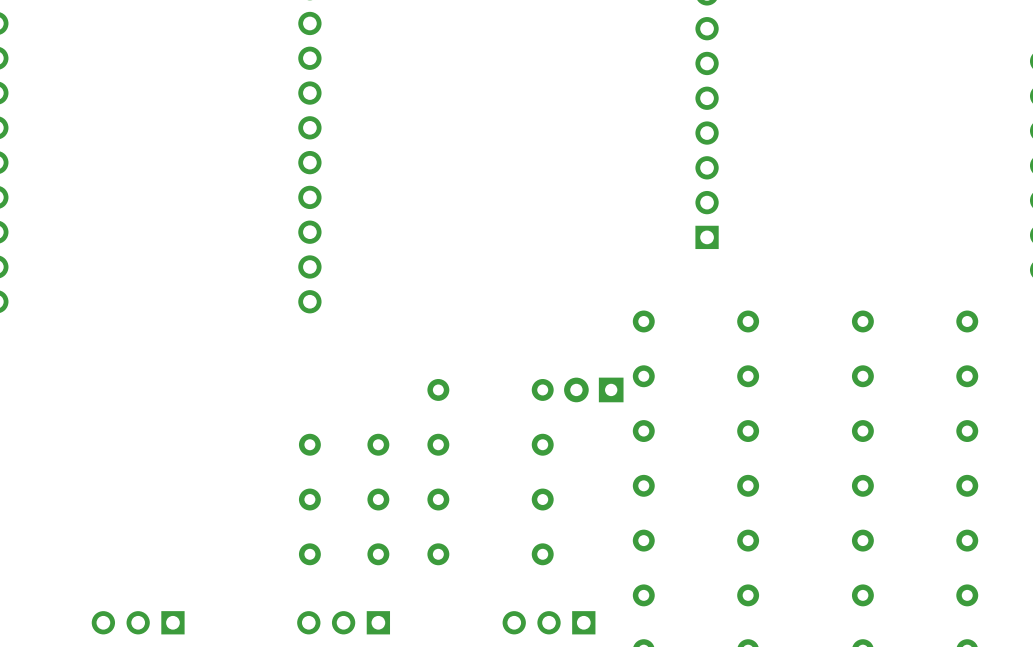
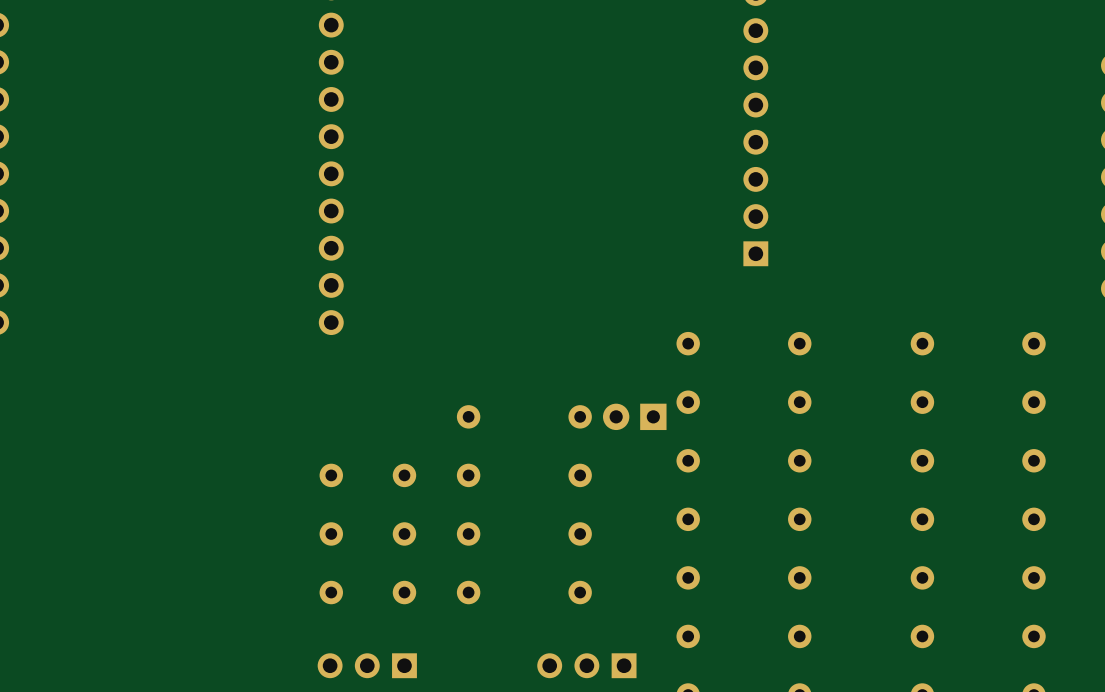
part: (138, 622) -> none

